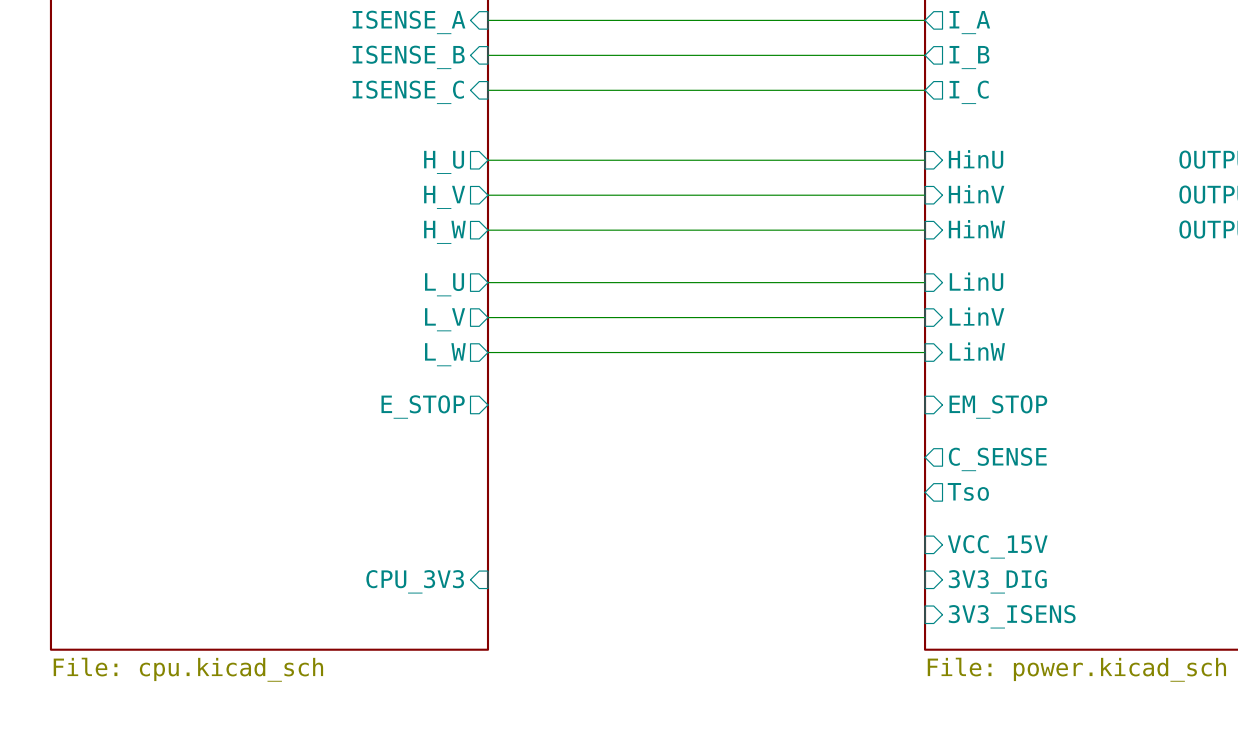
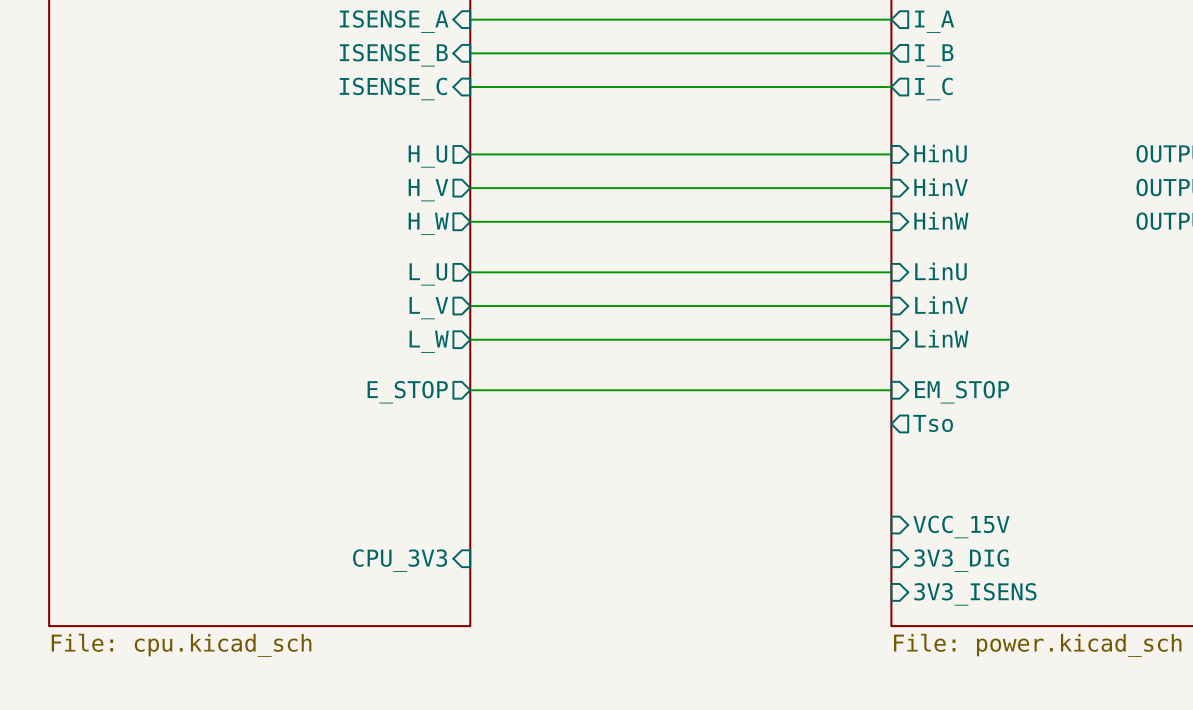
wire: none -> (470, 390) (891, 390)
sheet pin: C_SENSE (997, 459) -> none
sheet pin position: Tso (968, 491) -> Tso (933, 423)

